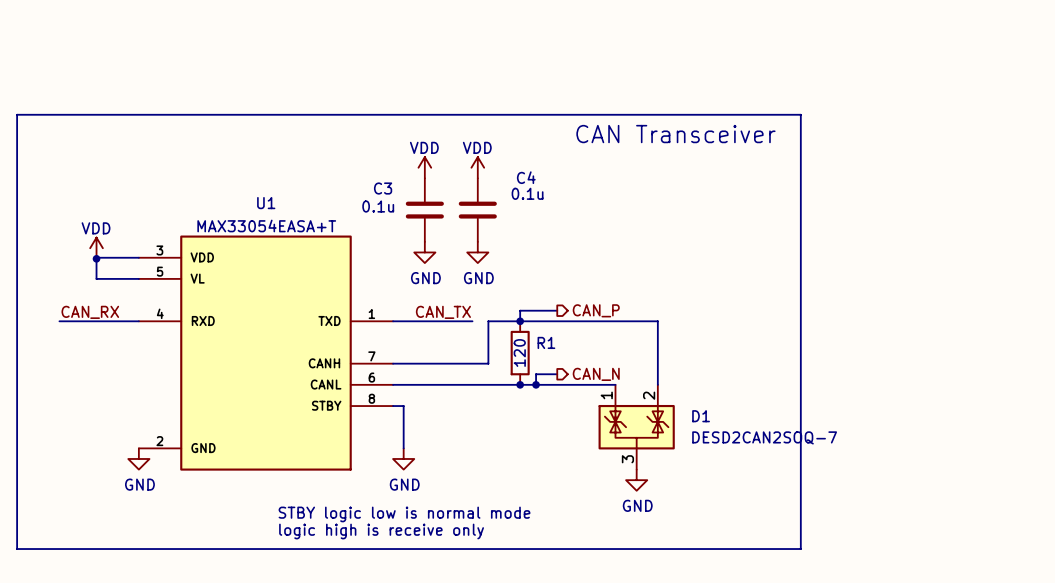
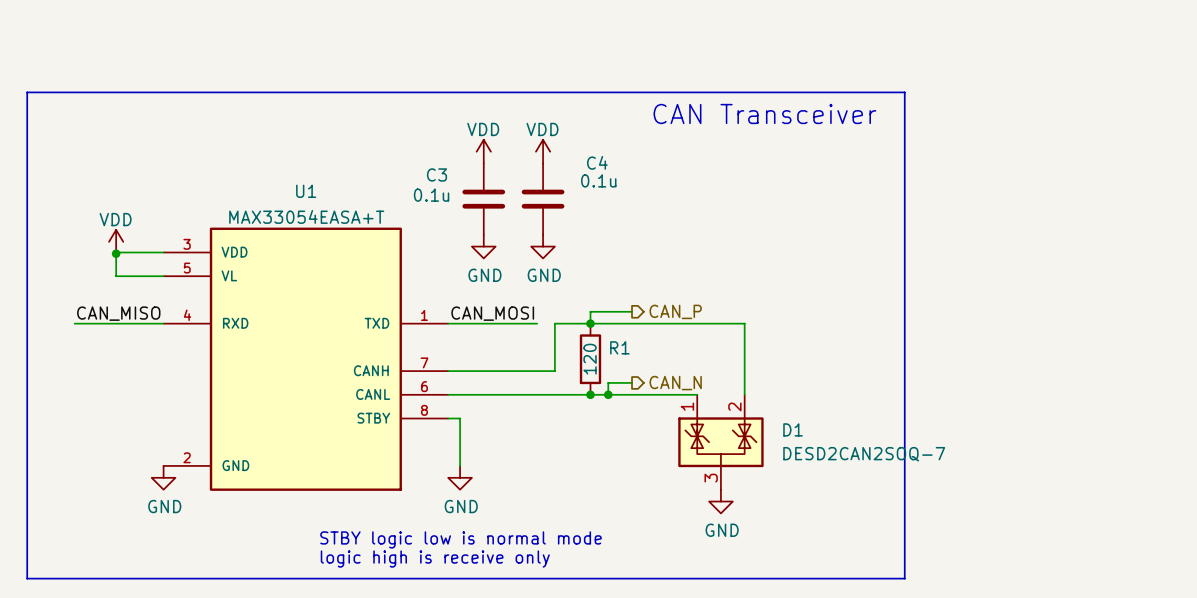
label: CAN_RX (90, 312) -> CAN_MISO (118, 313)
label: CAN_TX (443, 312) -> CAN_MOSI (492, 313)

